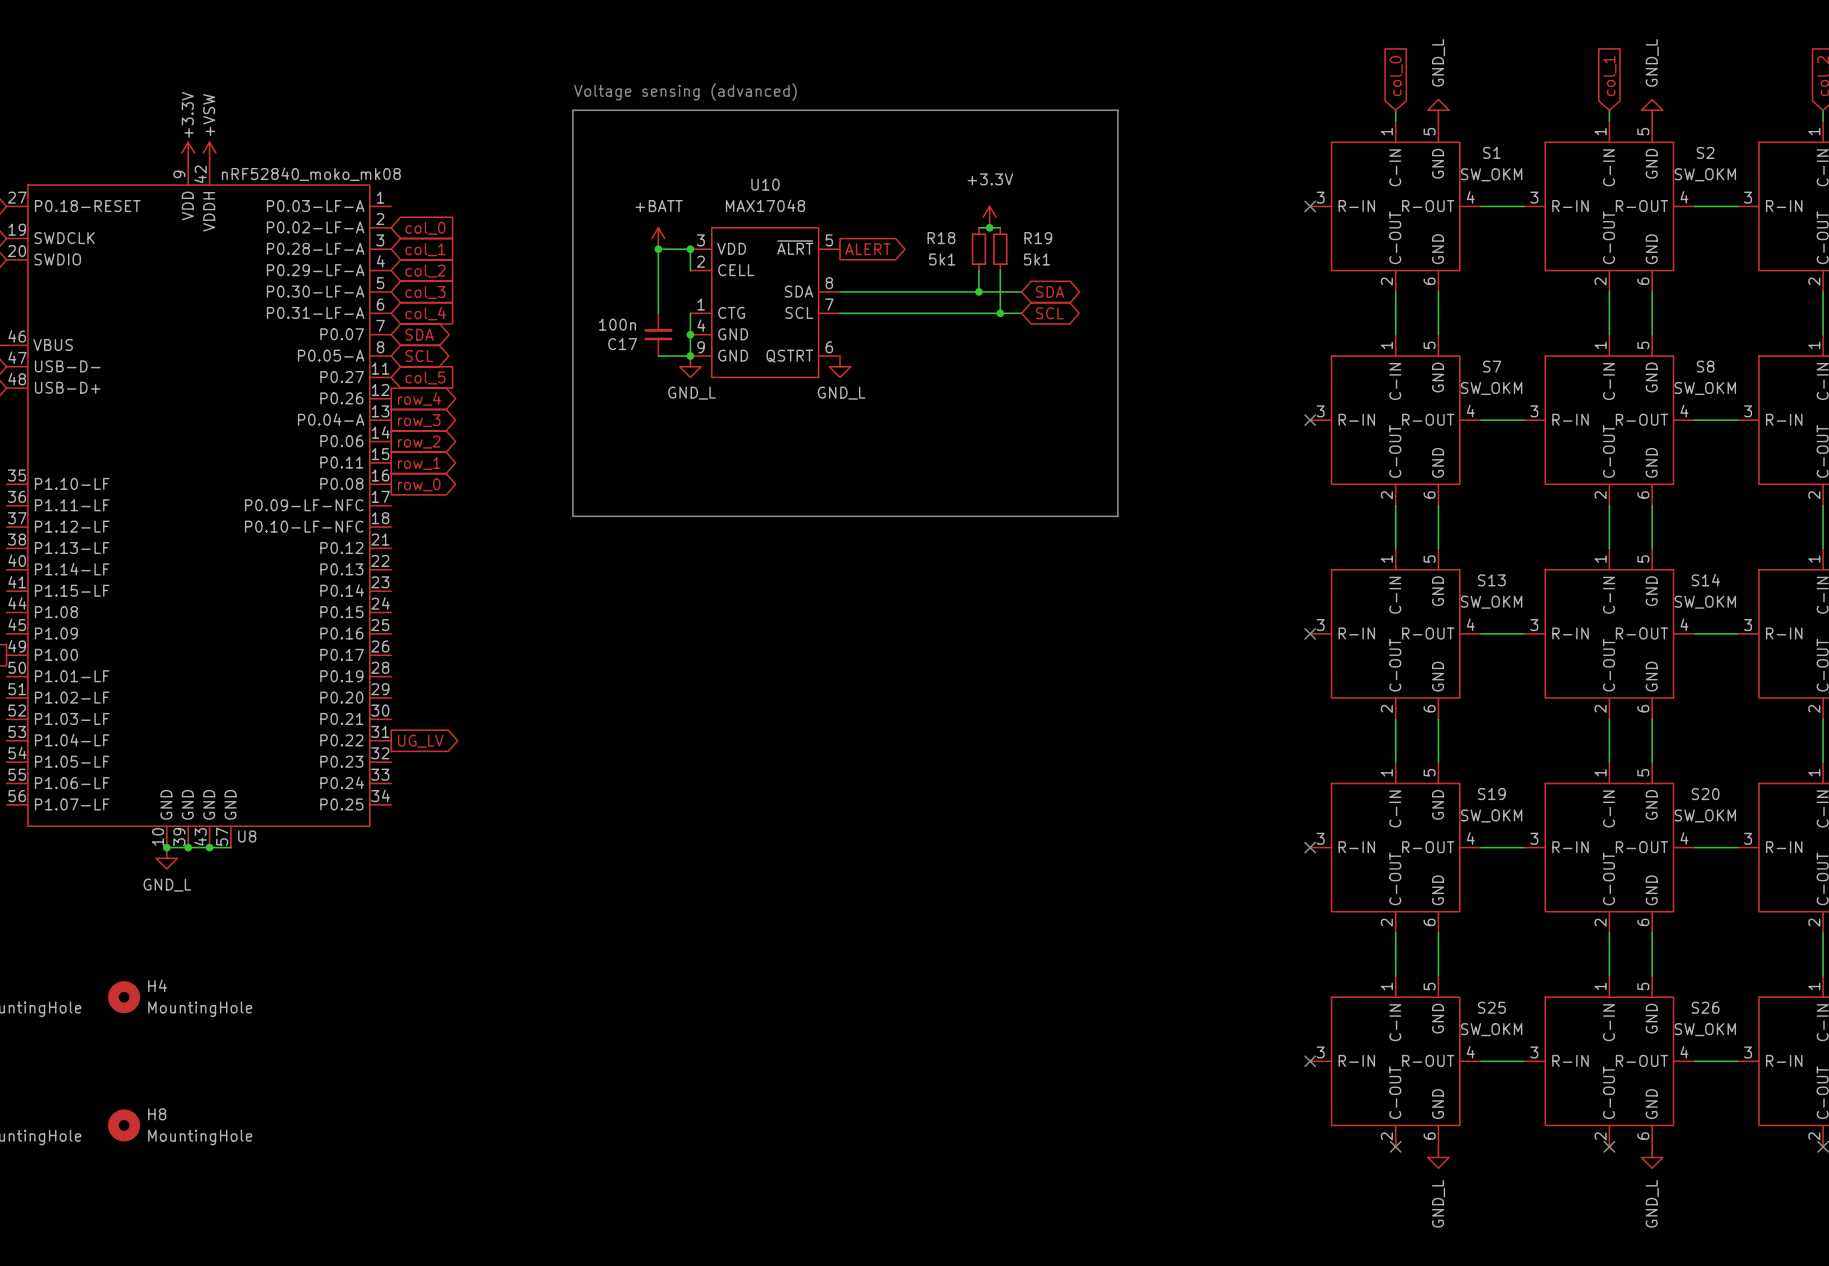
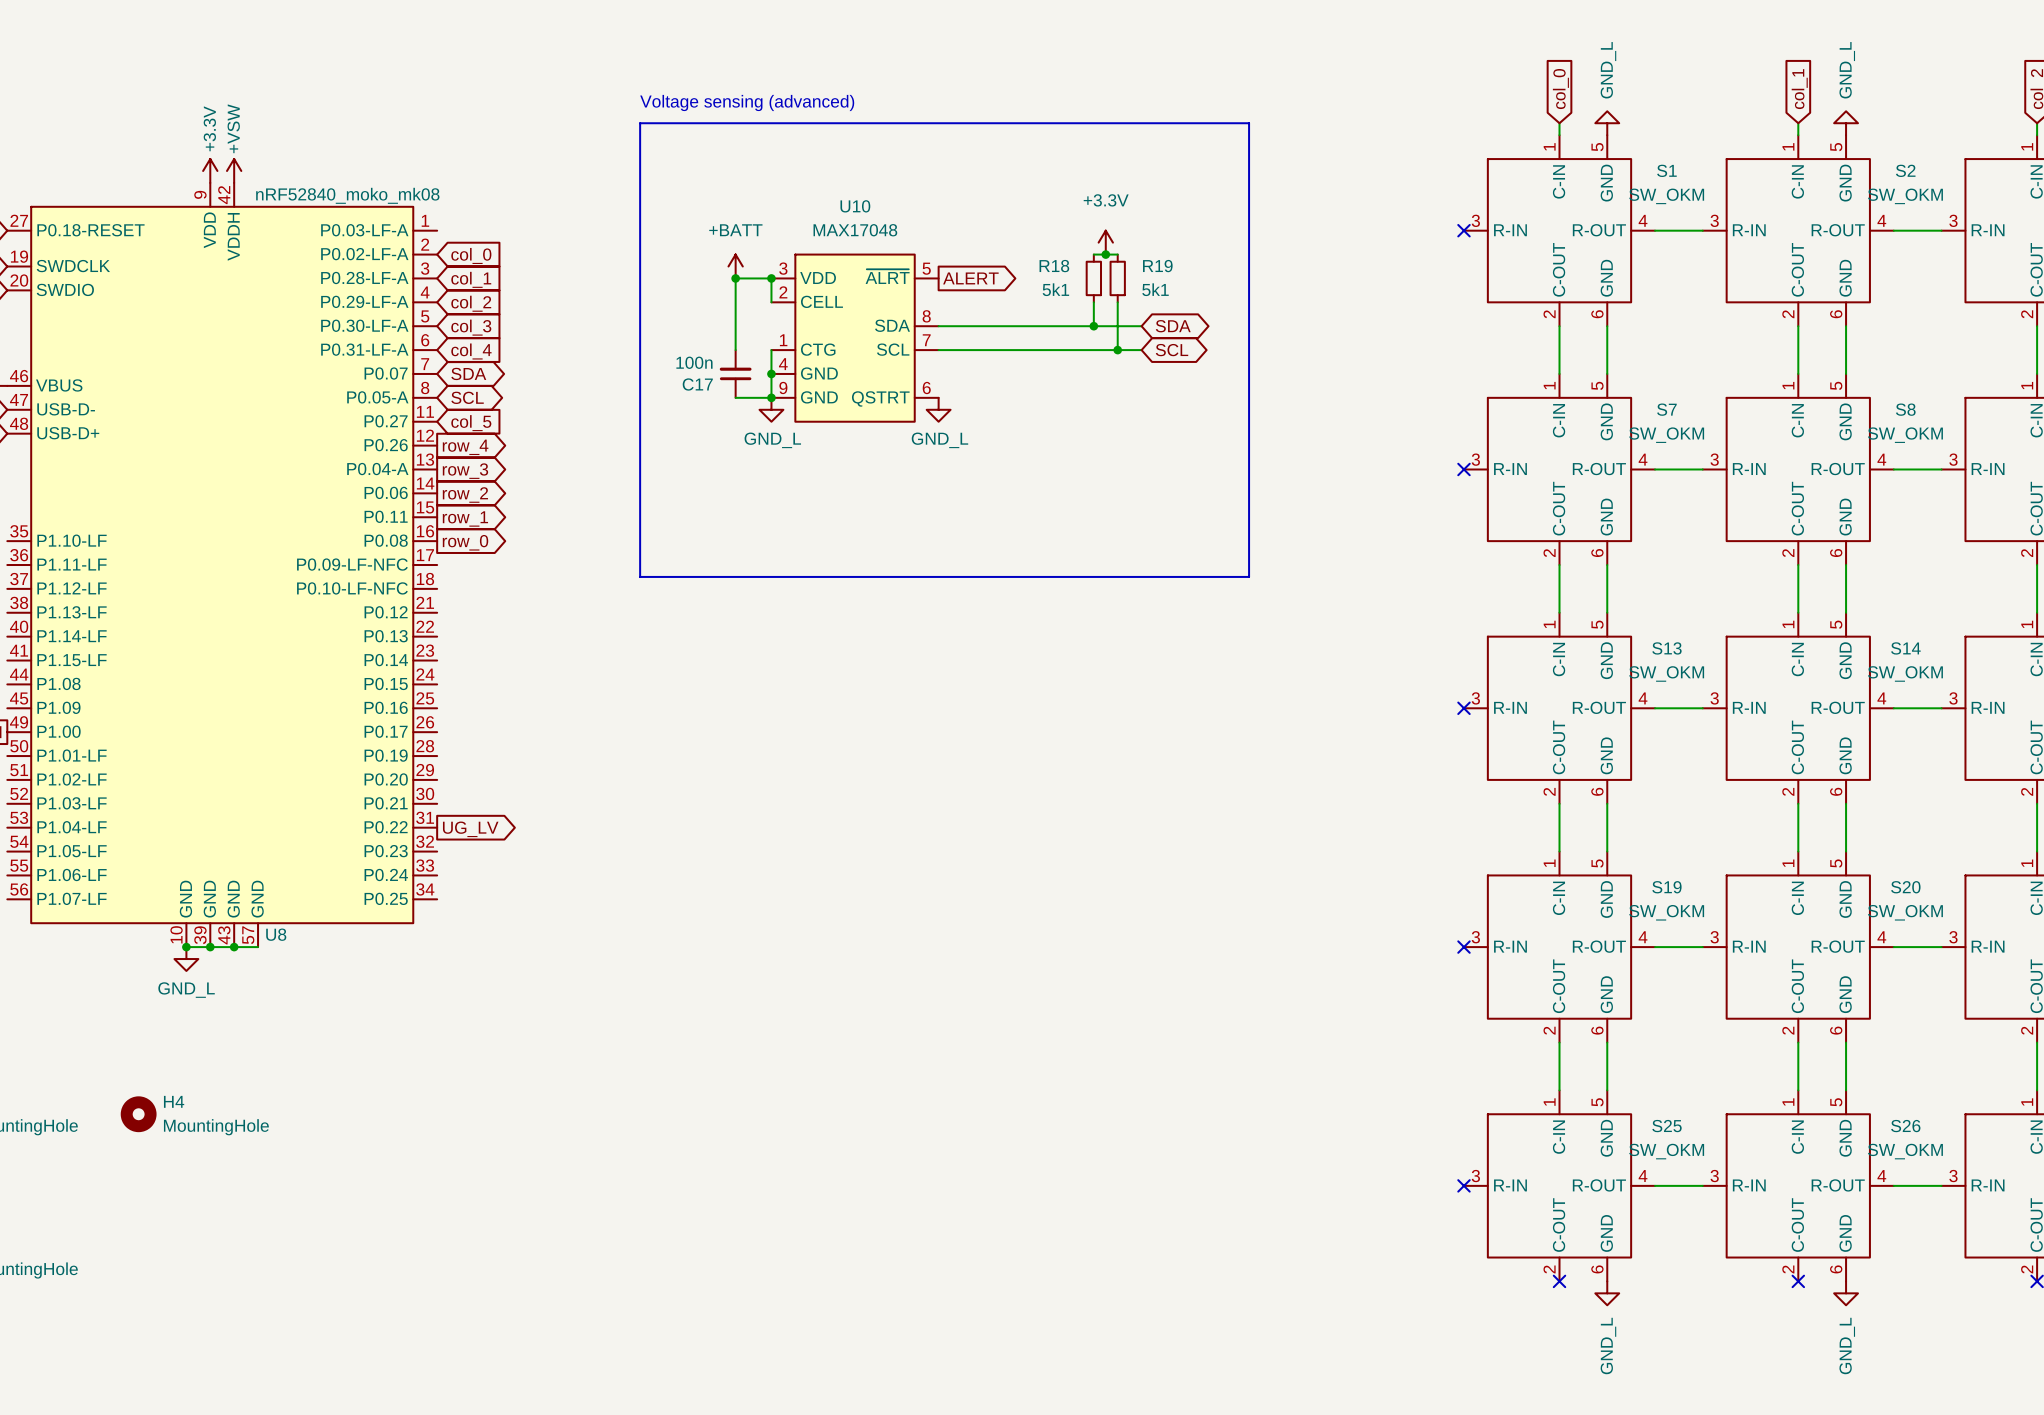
H8: MountingHole (124, 1125) -> none

